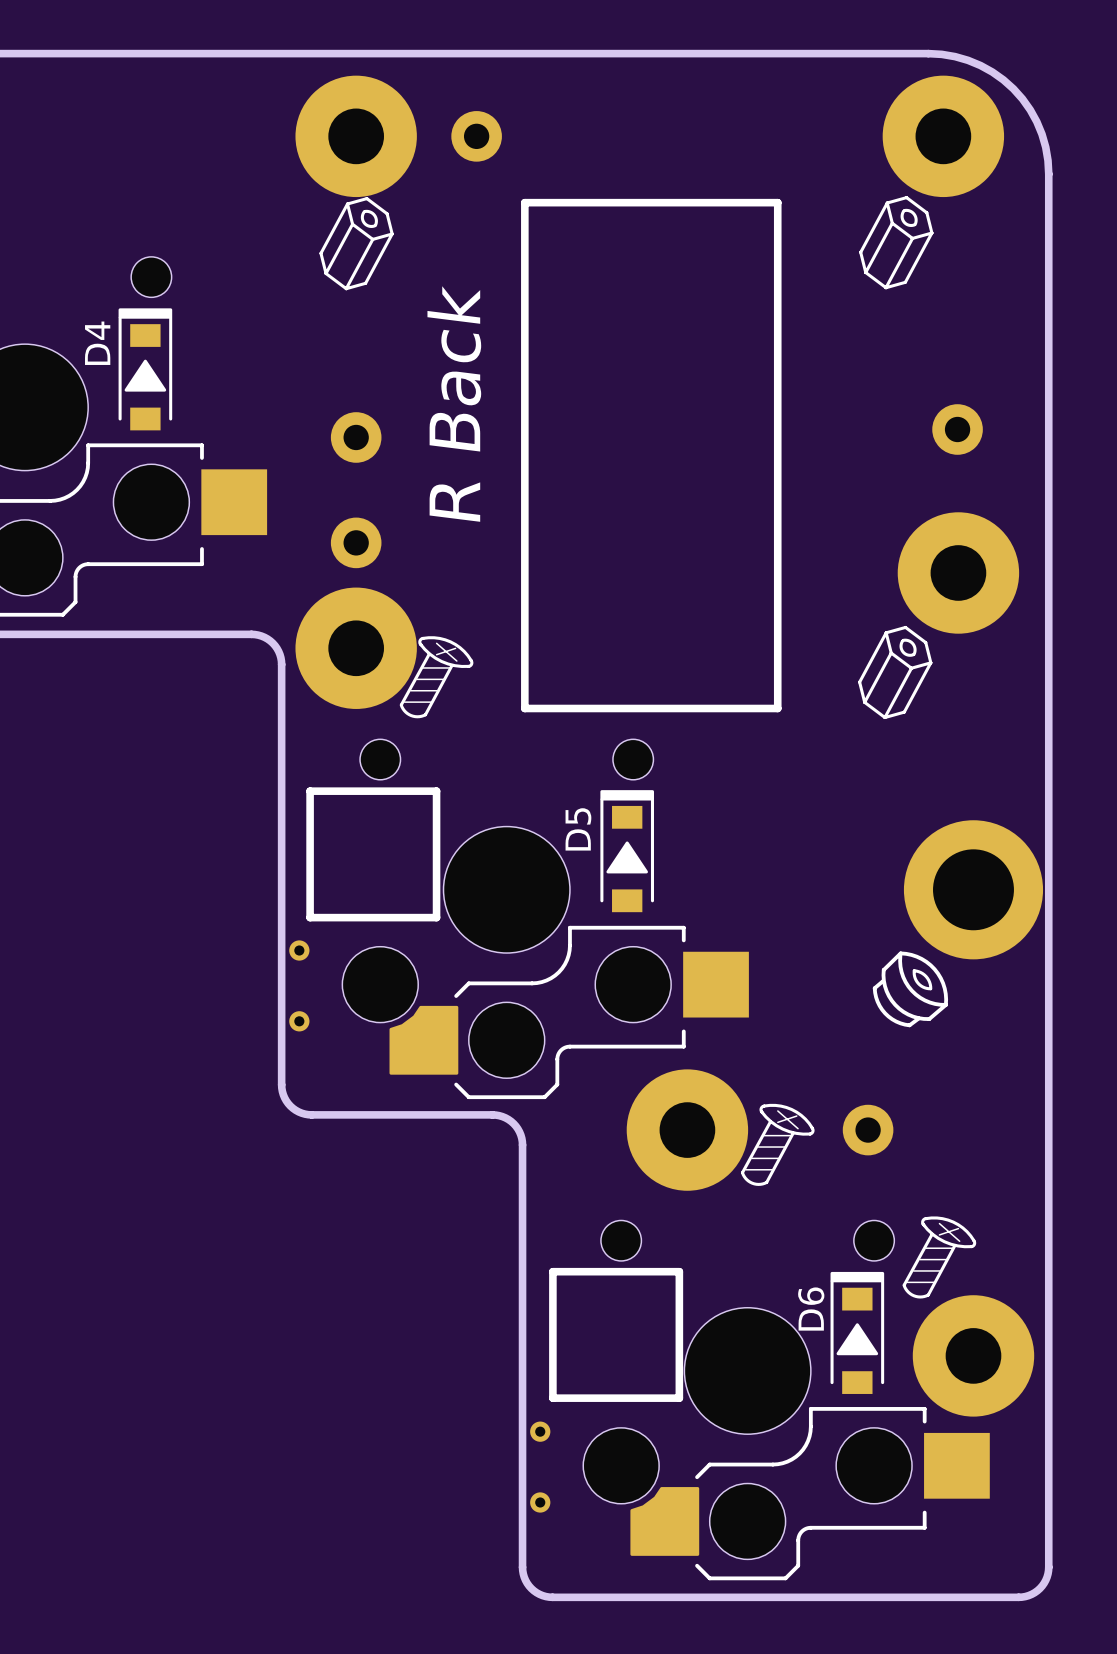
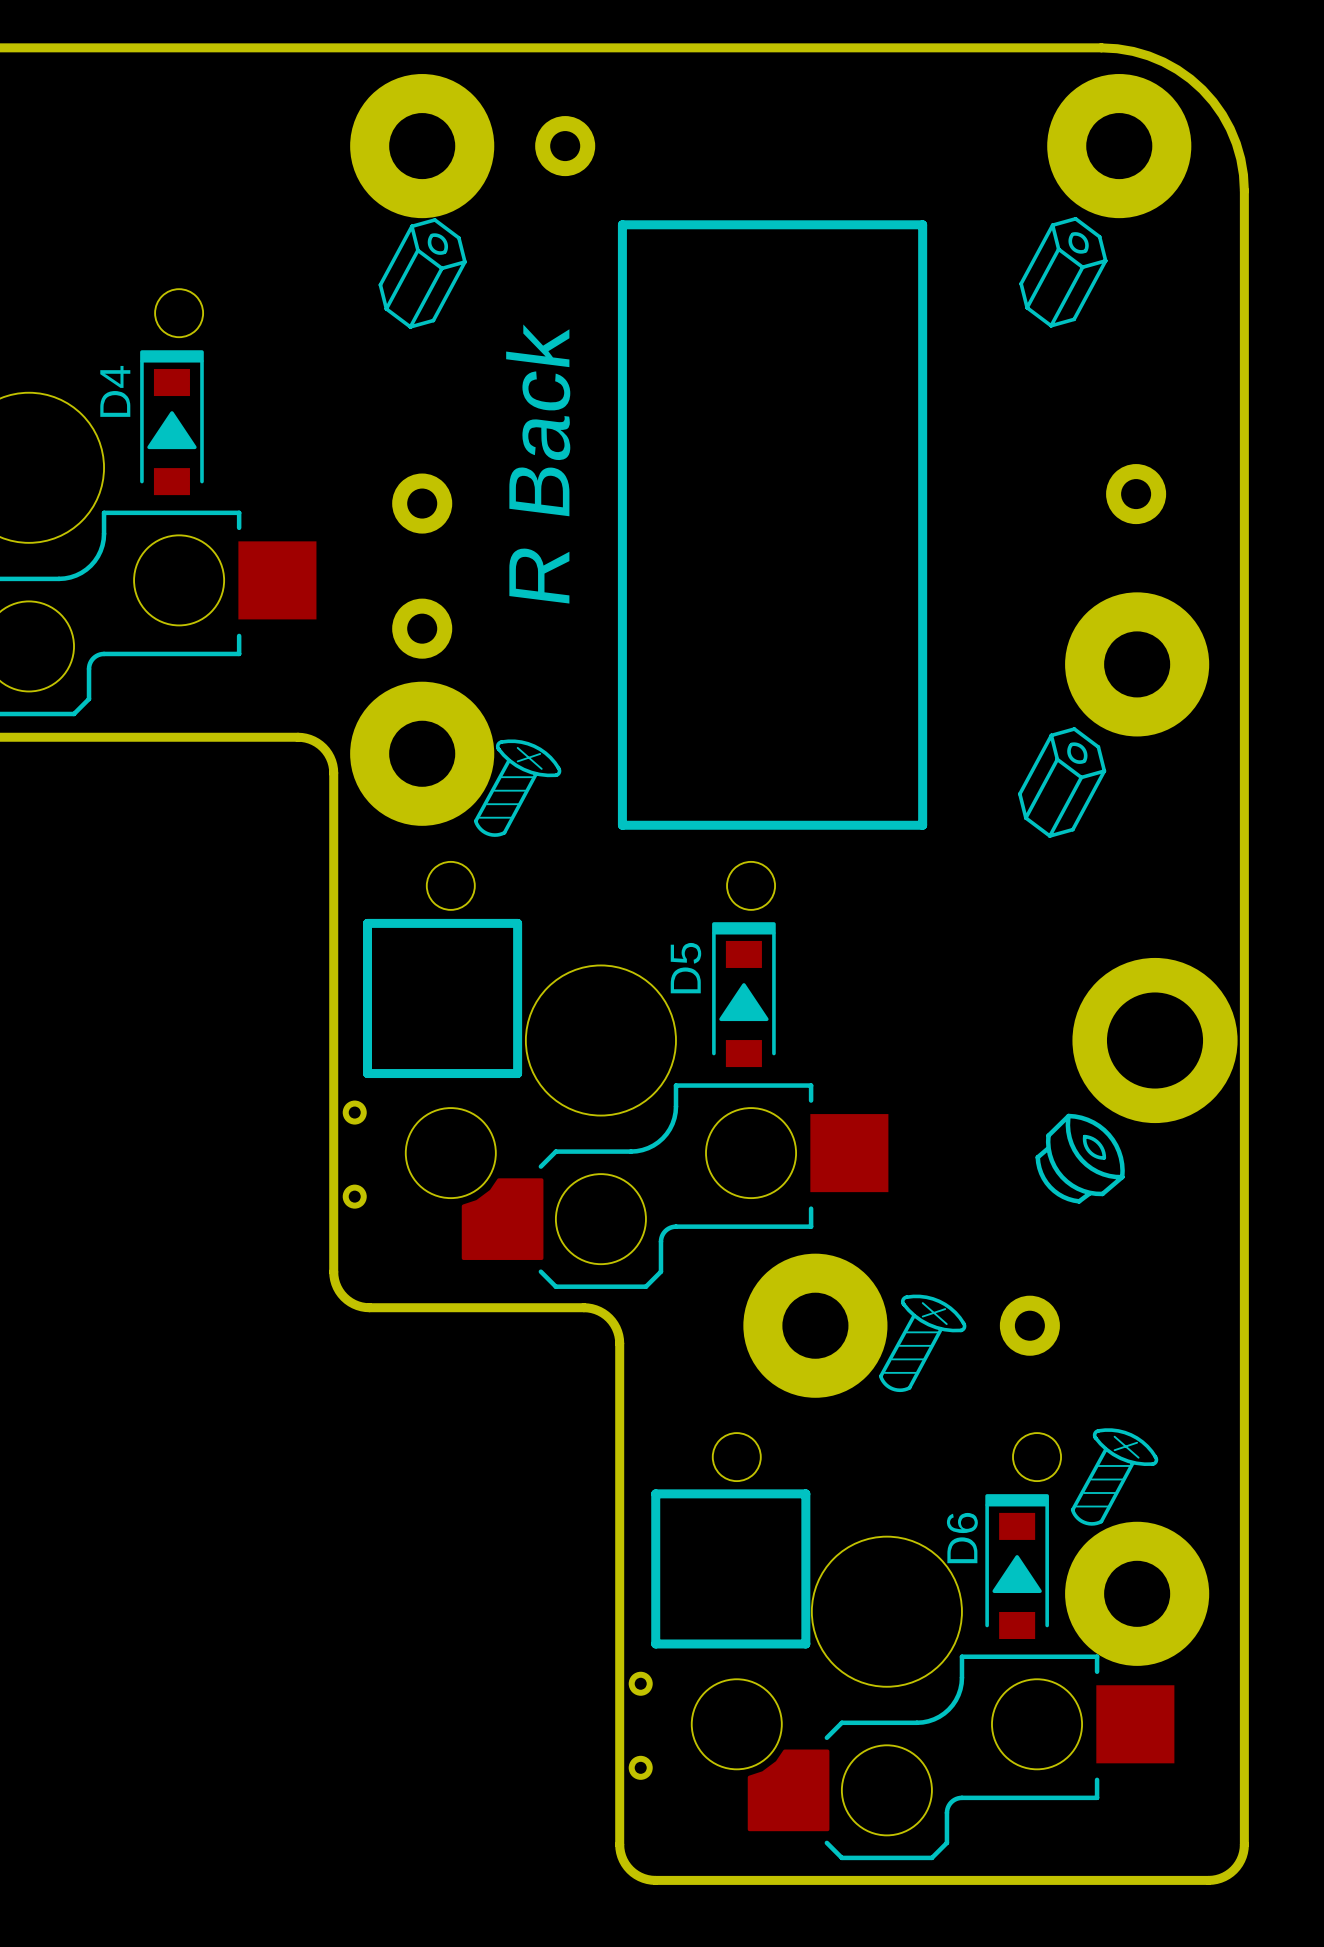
part position: (973, 1355) -> (1137, 1593)

